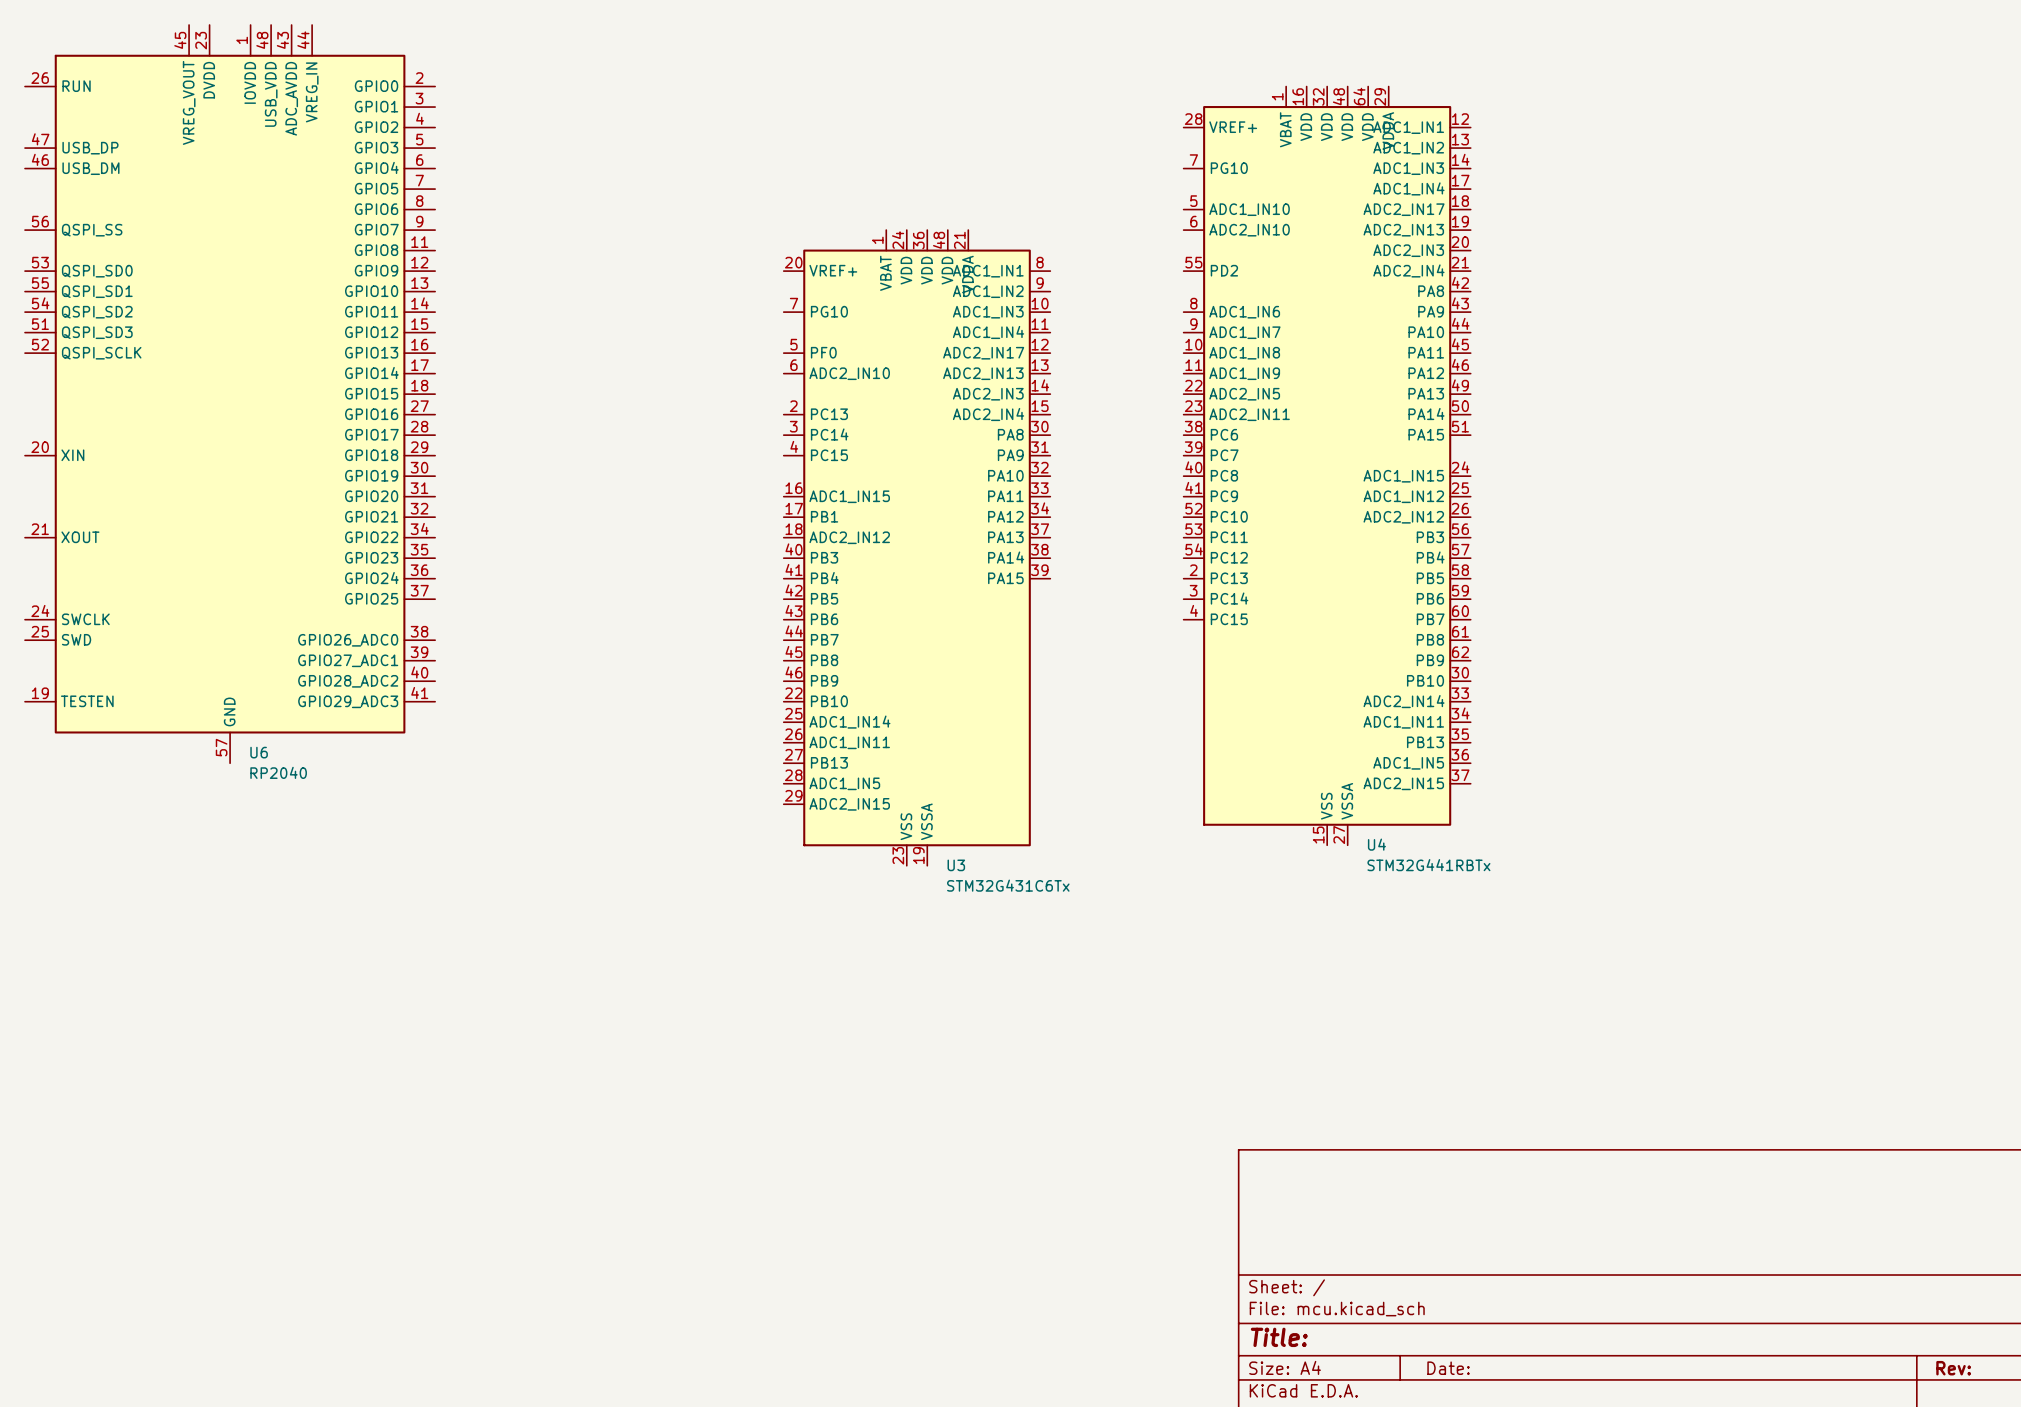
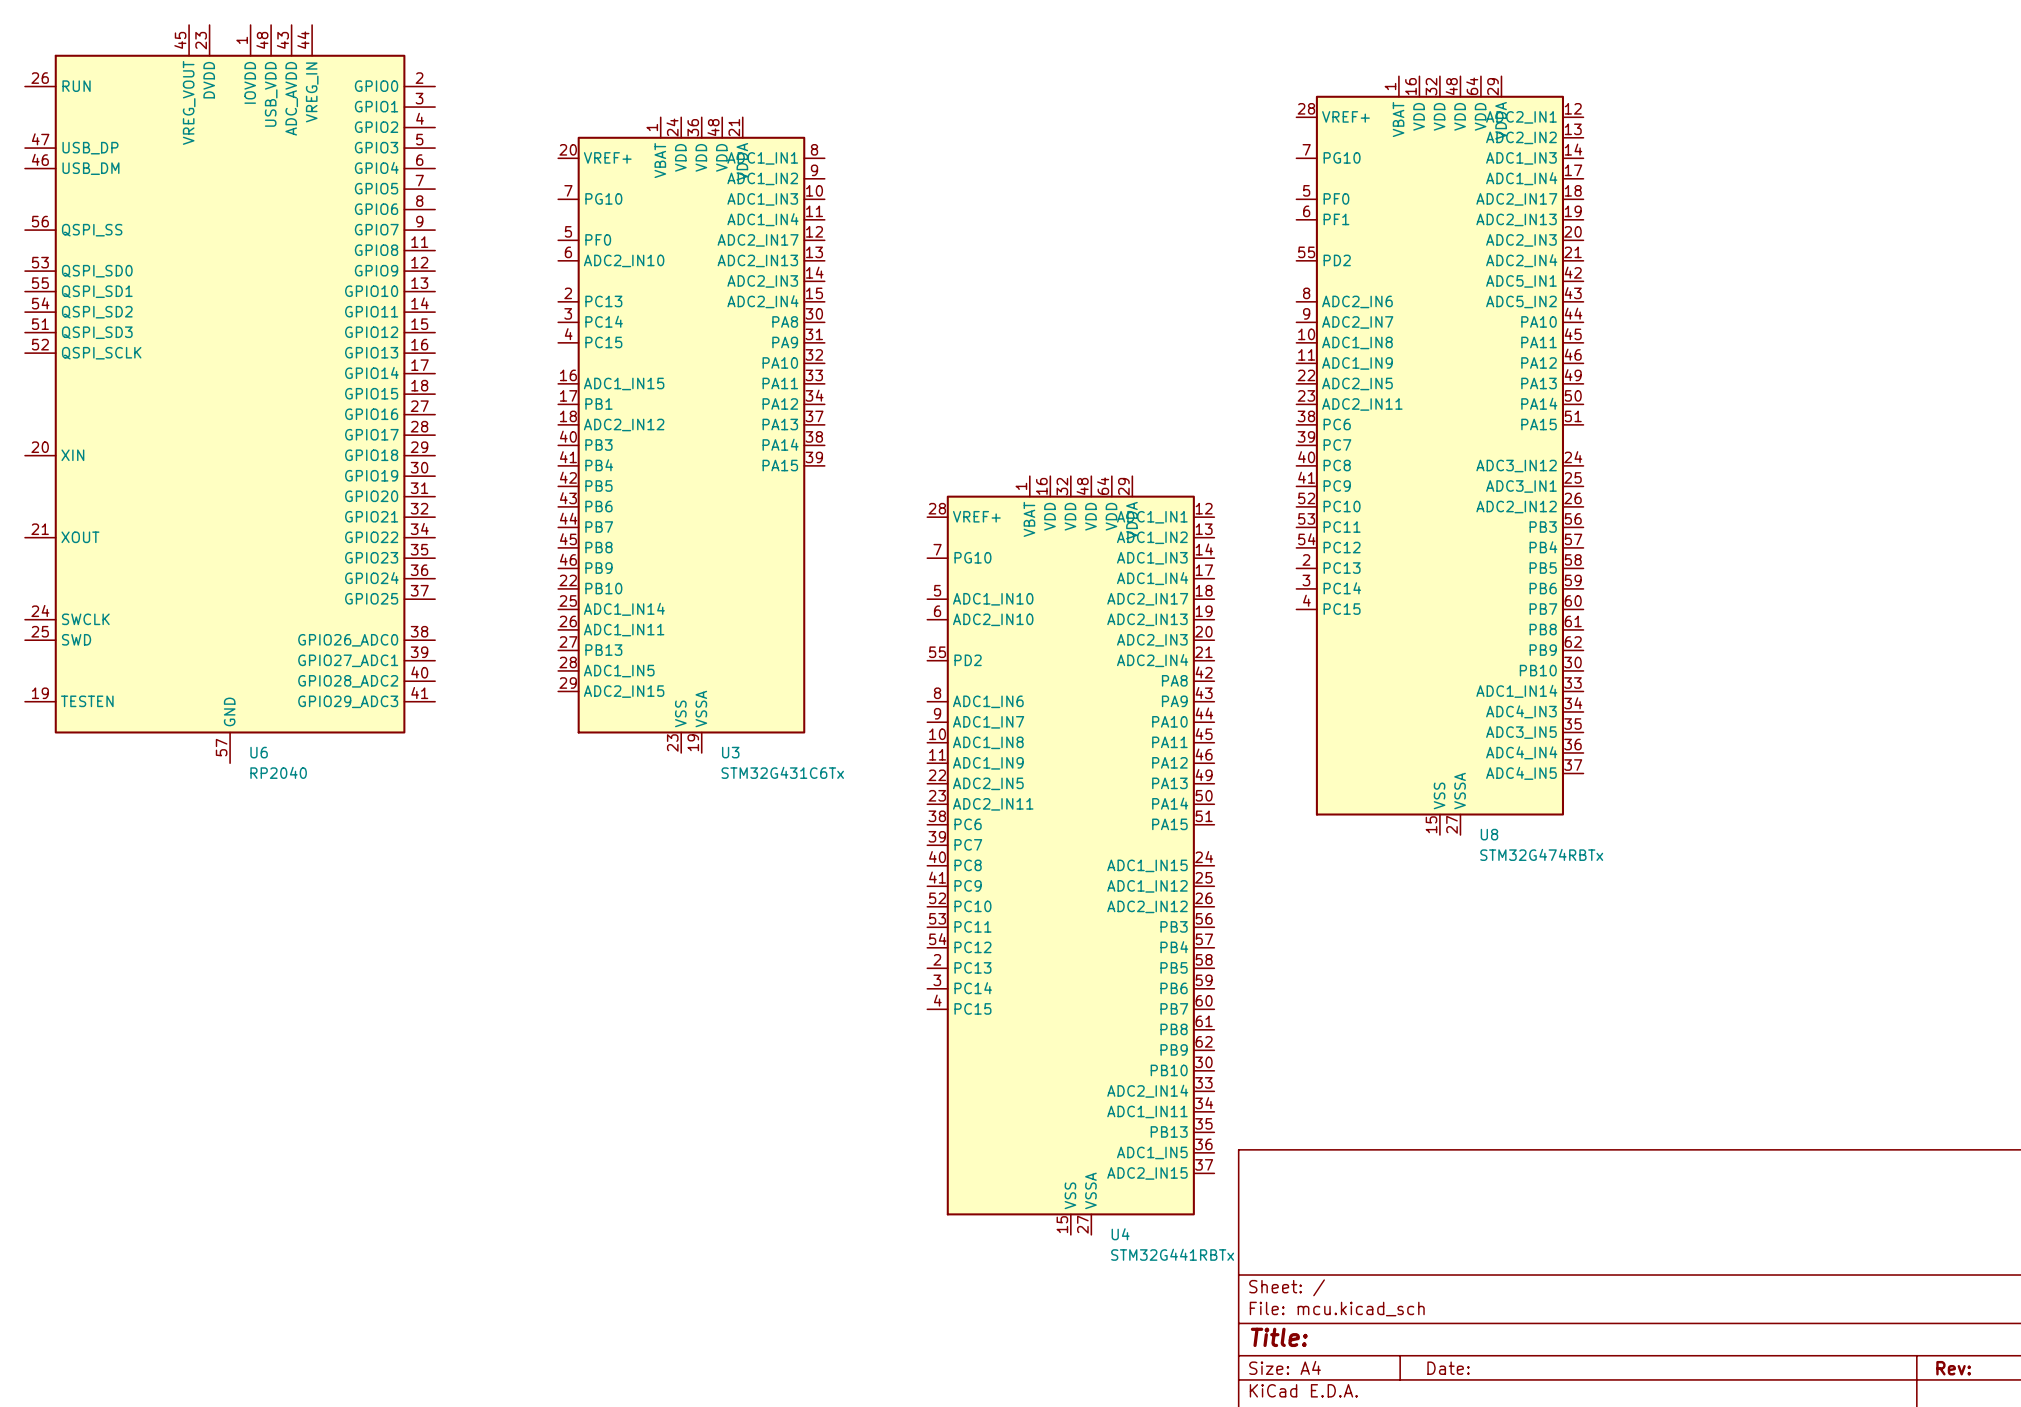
U8: none -> STM32G474RBTx (1439, 455)
U4 position: (1327, 465) -> (1070, 855)
U3 position: (917, 547) -> (691, 435)

